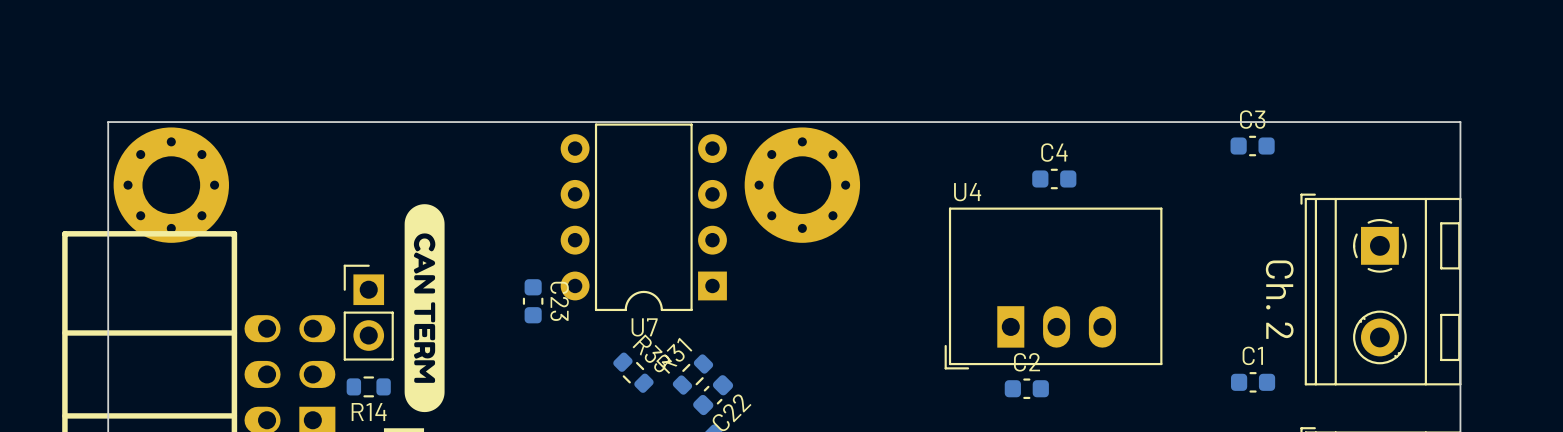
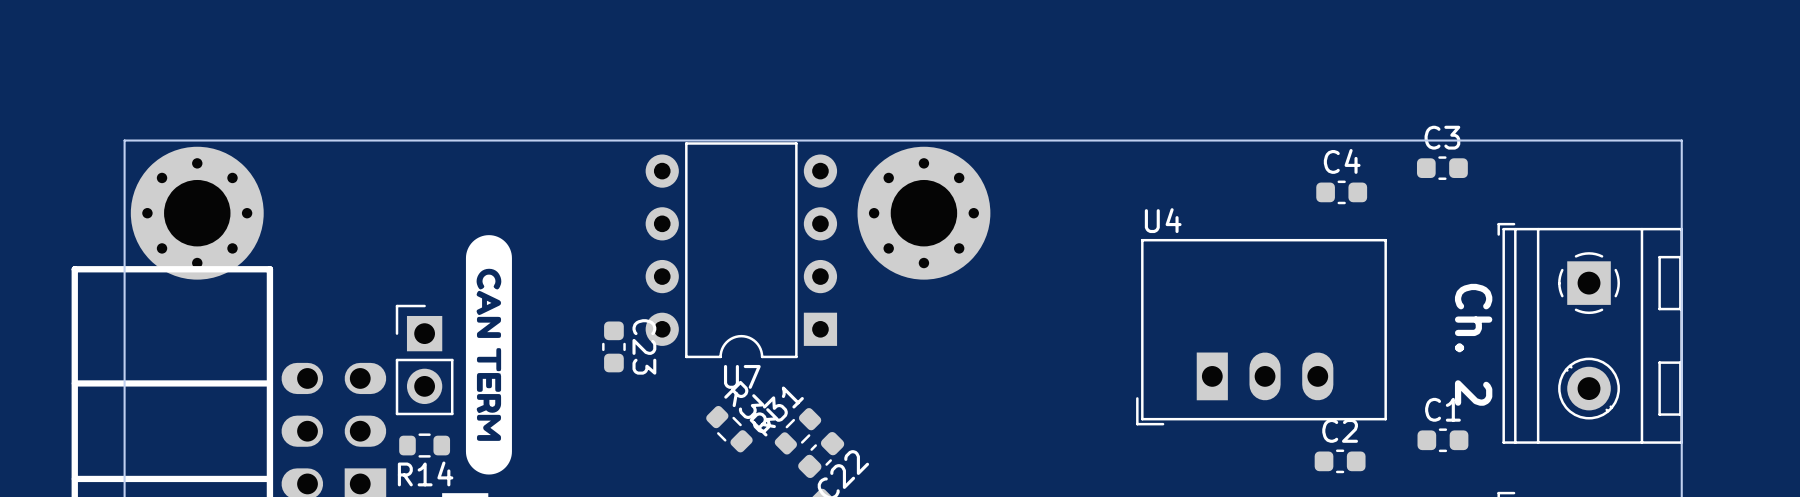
C4 position: (1054, 178) -> (1341, 192)
U4 position: (1053, 288) -> (1261, 332)
C2 position: (1026, 388) -> (1340, 461)

